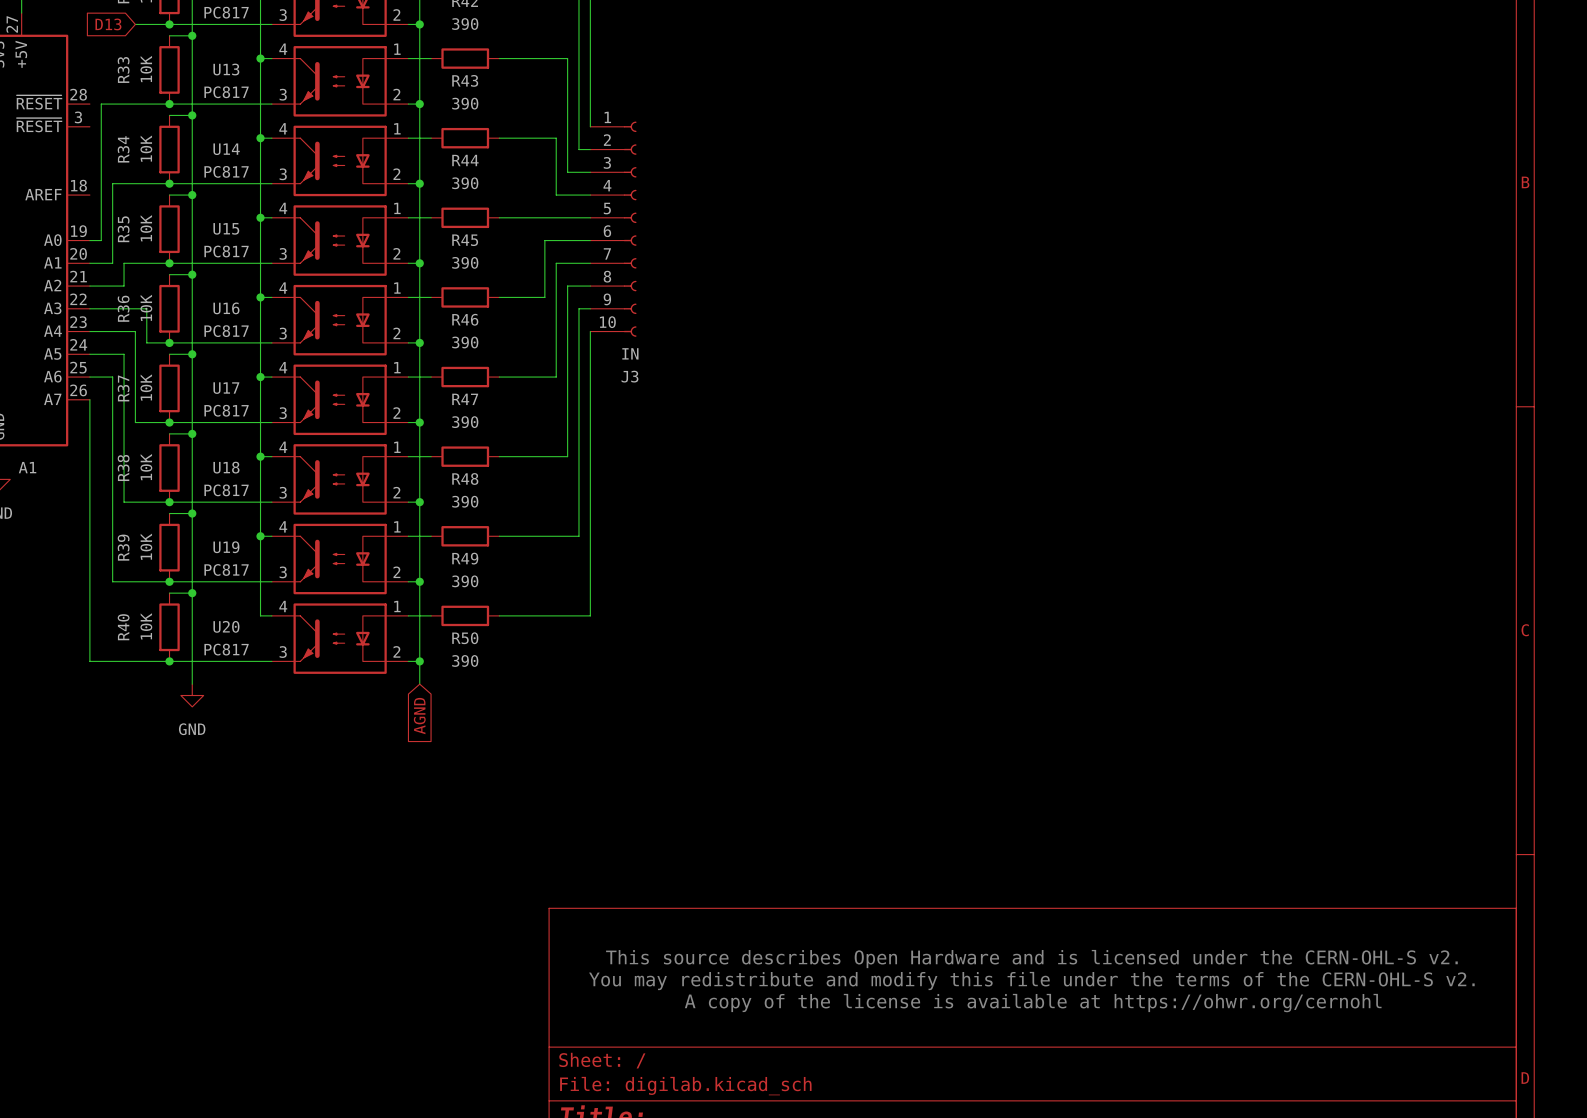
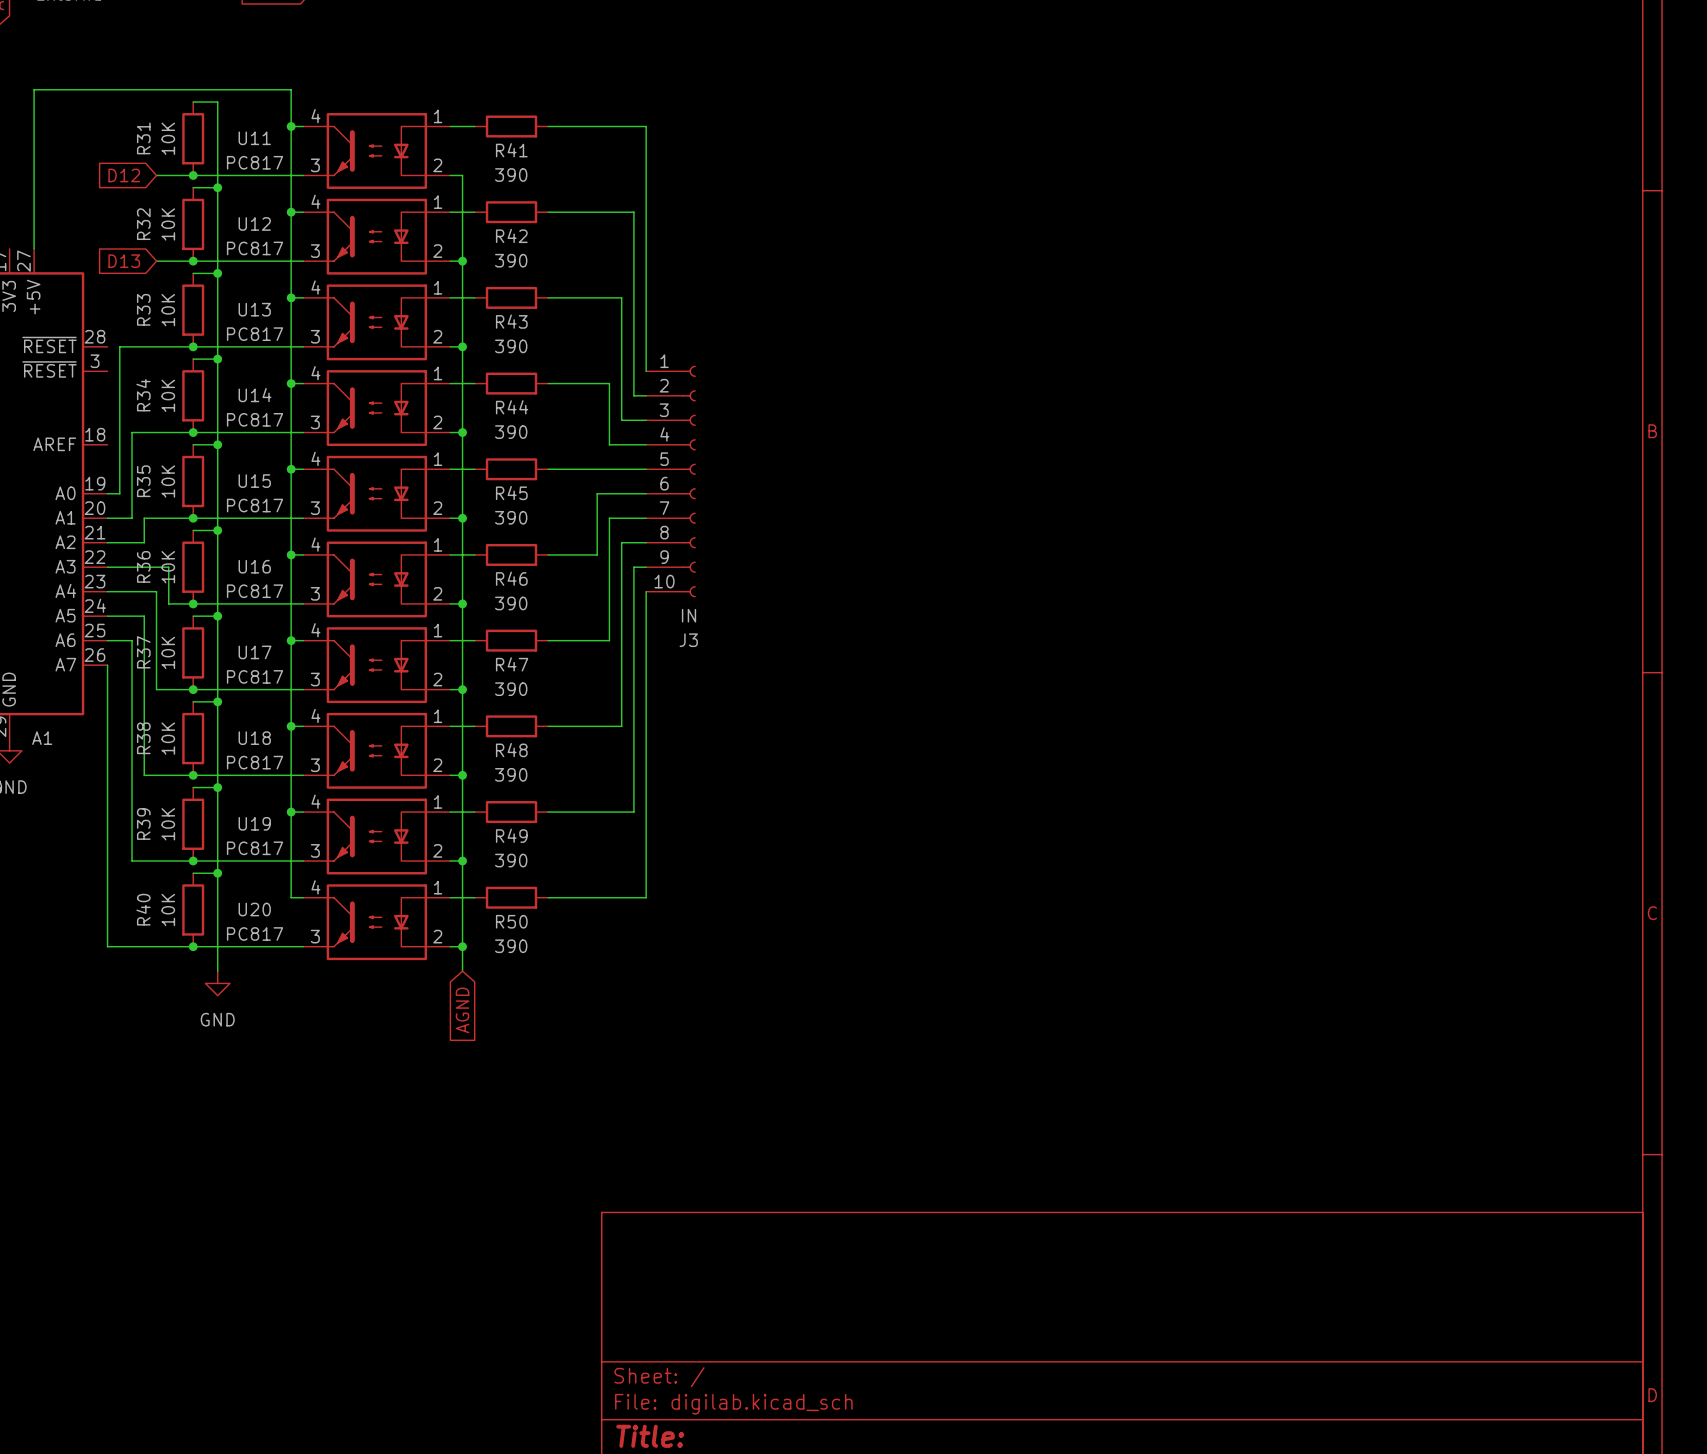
text: This source describes Open Hardware and is licensed under the CERN-OHL-S v2. (1031, 959) -> none
text: You may redistribute and modify this file under the terms of the CERN-OHL-S v2. (1031, 981) -> none
text: A copy of the license is available at https://ohwr.org/cernohl (1033, 1003) -> none

